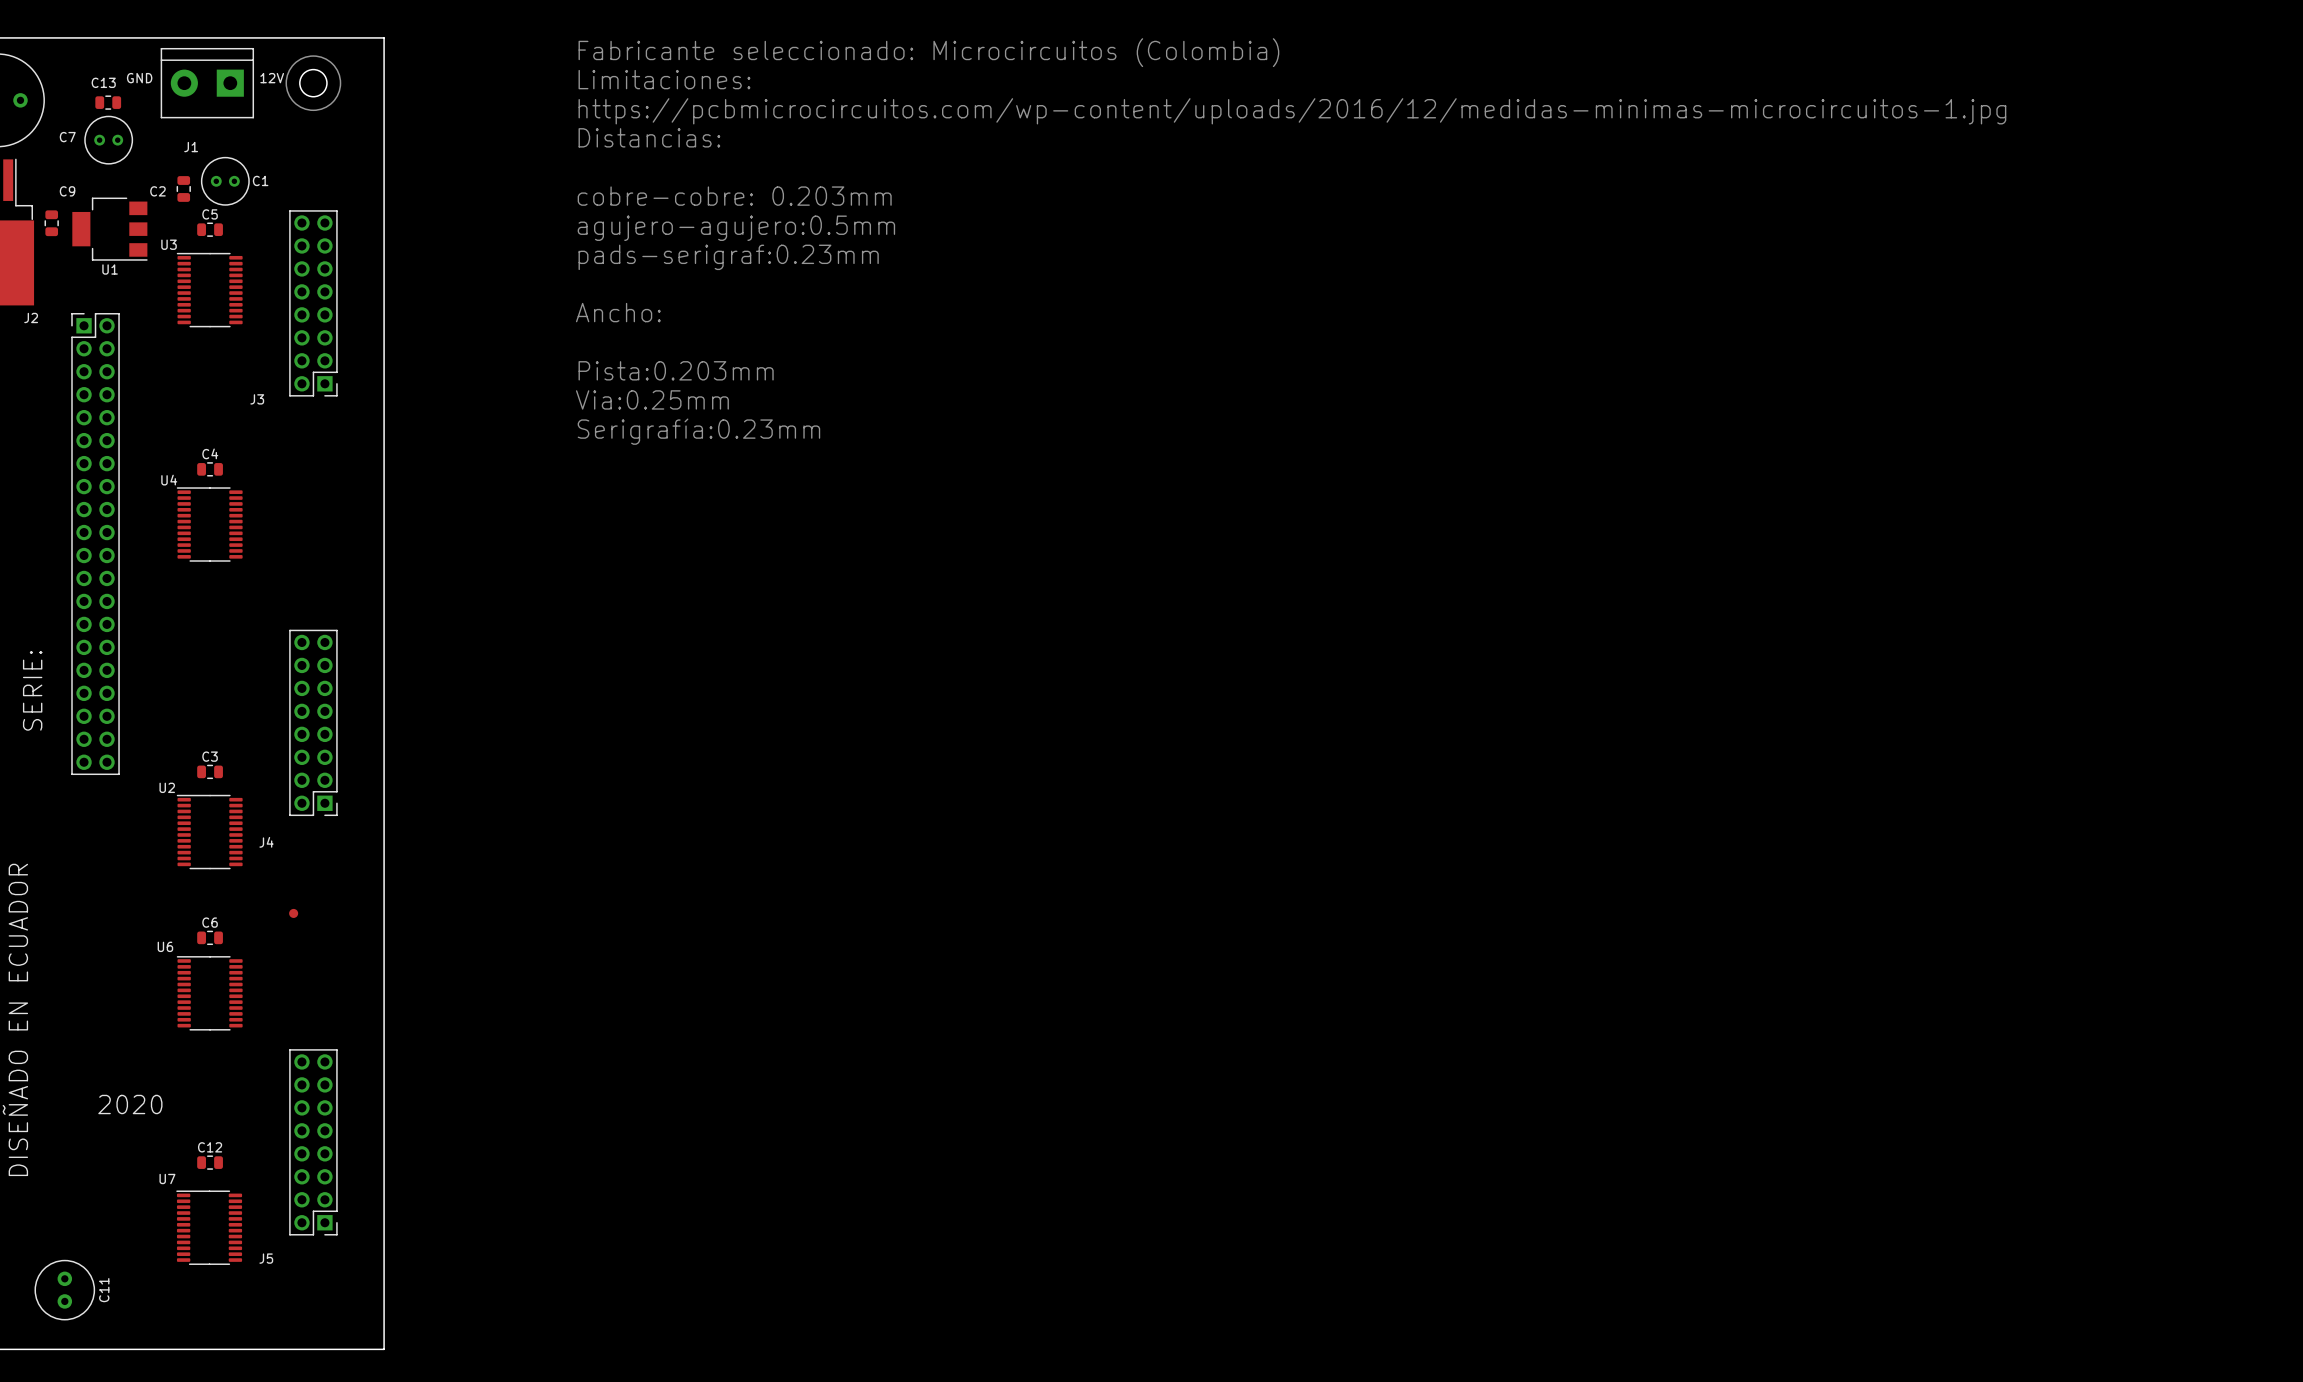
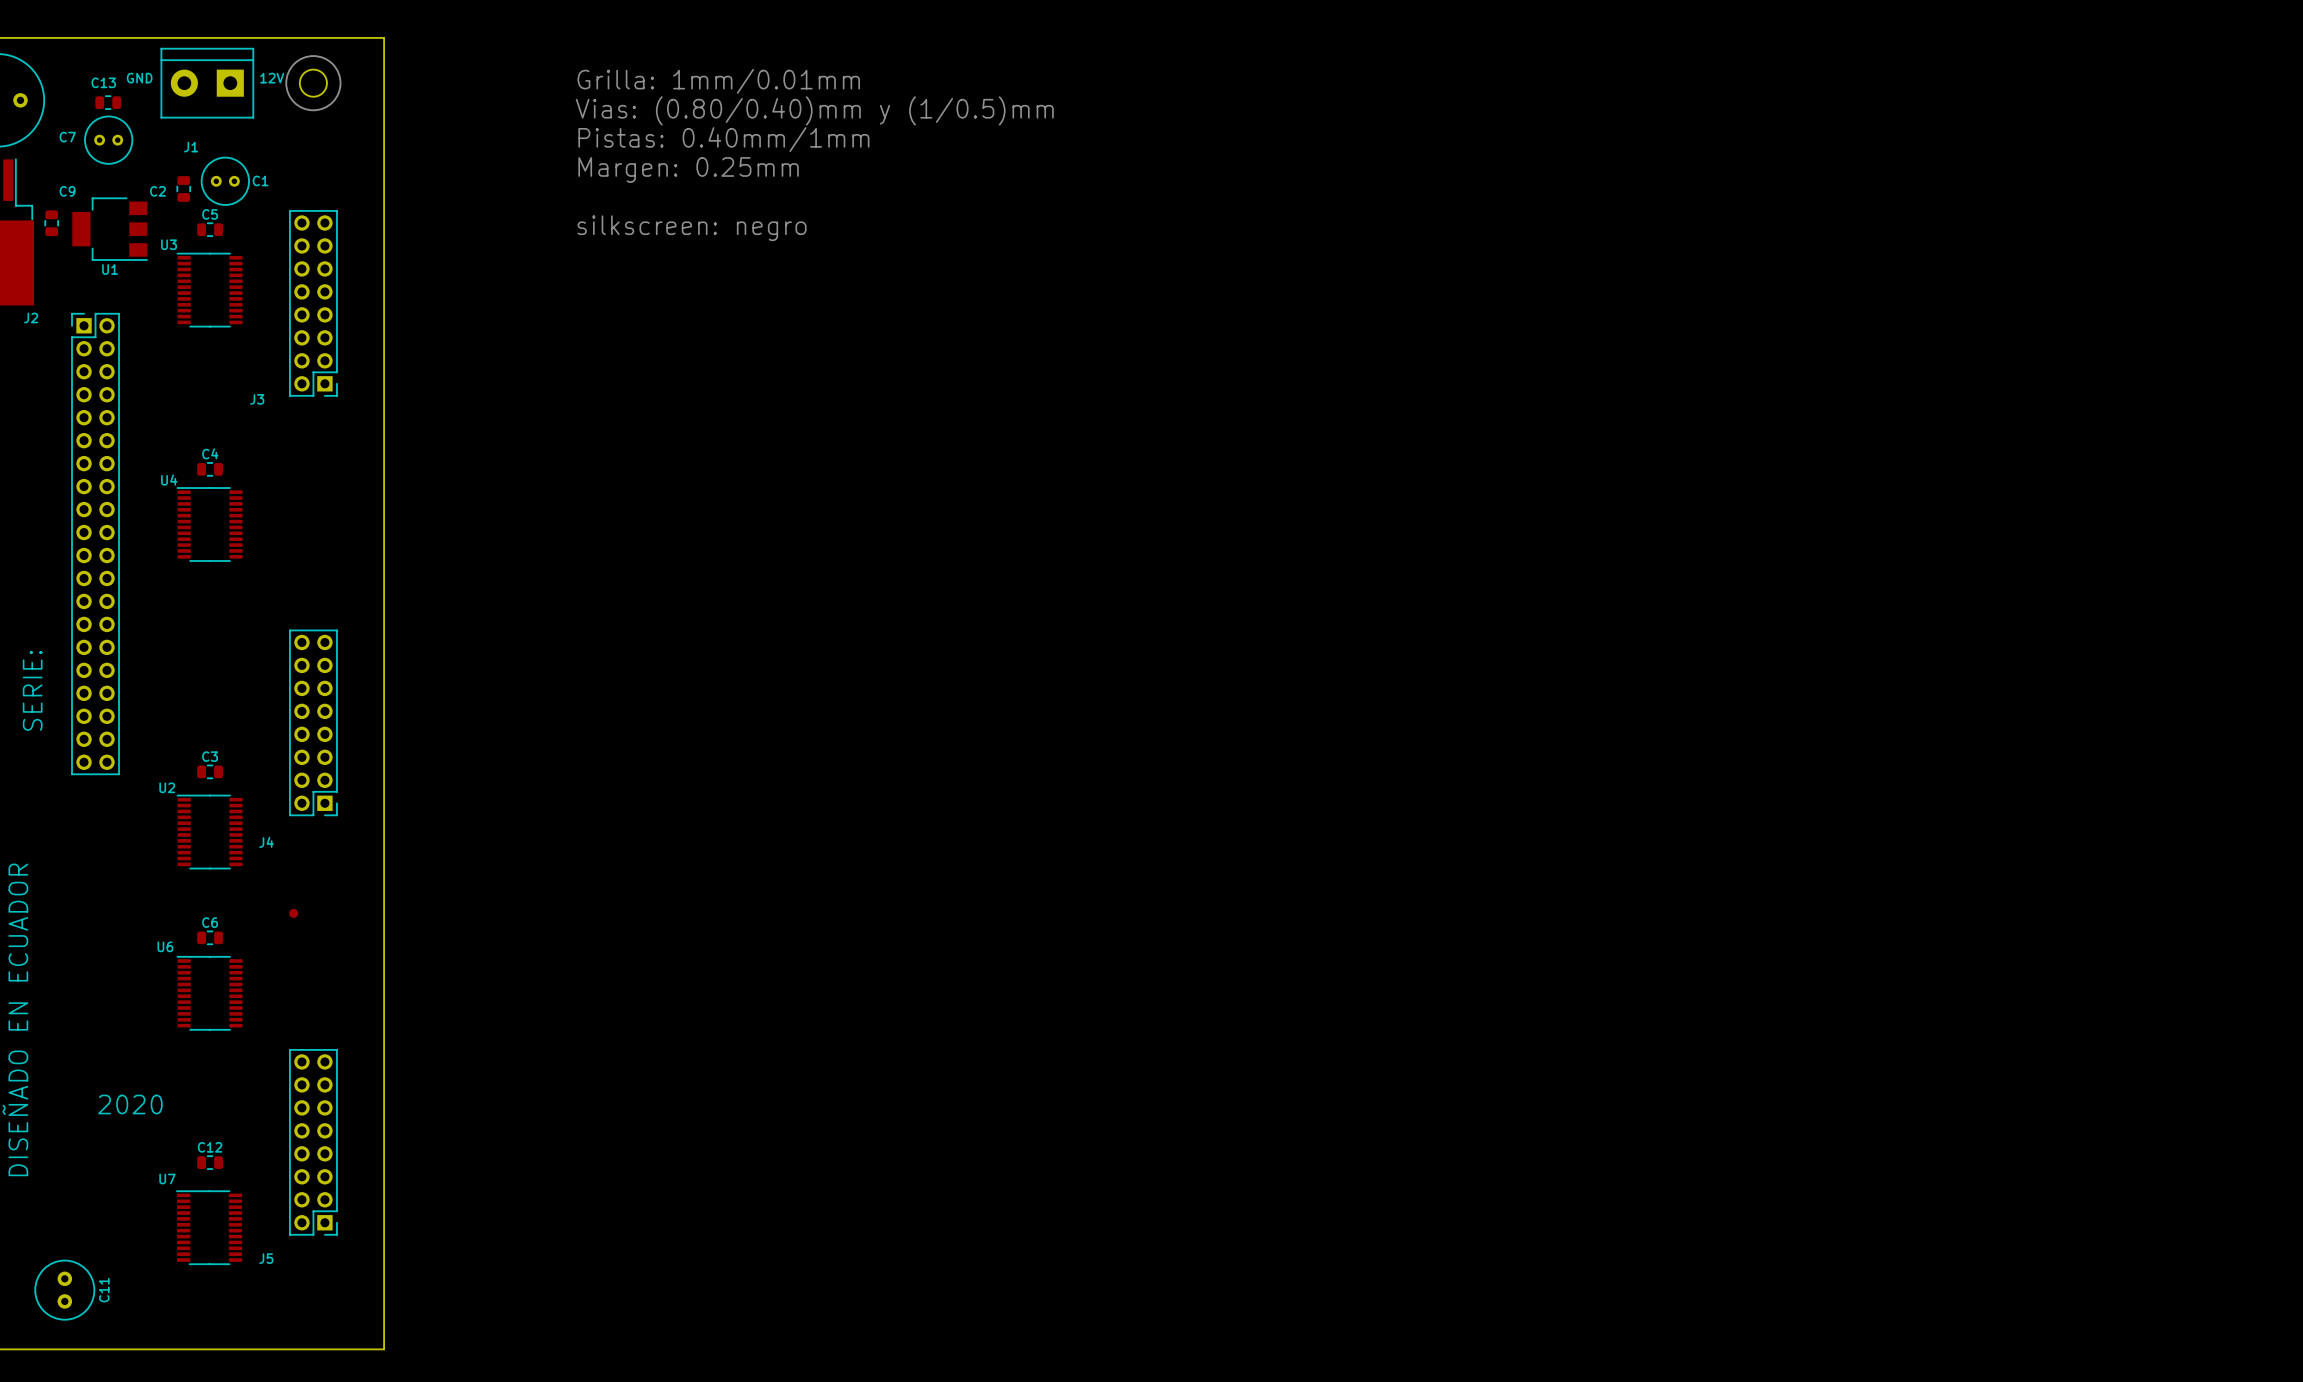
text: Fabricante seleccionado: Microcircuitos (Colombia) (928, 52) -> none
text: Limitaciones: (664, 79) -> Grilla: 1mm/0.01mm (718, 81)
text: https://pcbmicrocircuitos.com/wp-content/uploads/2016/12/medidas-minimas-microcircuitos-1.jpg (1292, 111) -> Vias: (0.80/0.40)mm y (1/0.5)mm (814, 110)
text: Distancias: (649, 137) -> Pistas: 0.40mm/1mm (723, 139)
text: none -> Margen: 0.25mm (688, 169)
text: cobre-cobre: 0.203mm (734, 196) -> none
text: agujero-agujero:0.5mm (736, 228) -> silkscreen: negro (692, 228)
text: pads-serigraf:0.23mm (728, 257) -> none
text: Ancho: (618, 312) -> none
text: Pista:0.203mm (676, 370) -> none
text: Via:0.25mm (652, 399) -> none
text: Serigrafía:0.23mm (698, 431) -> none

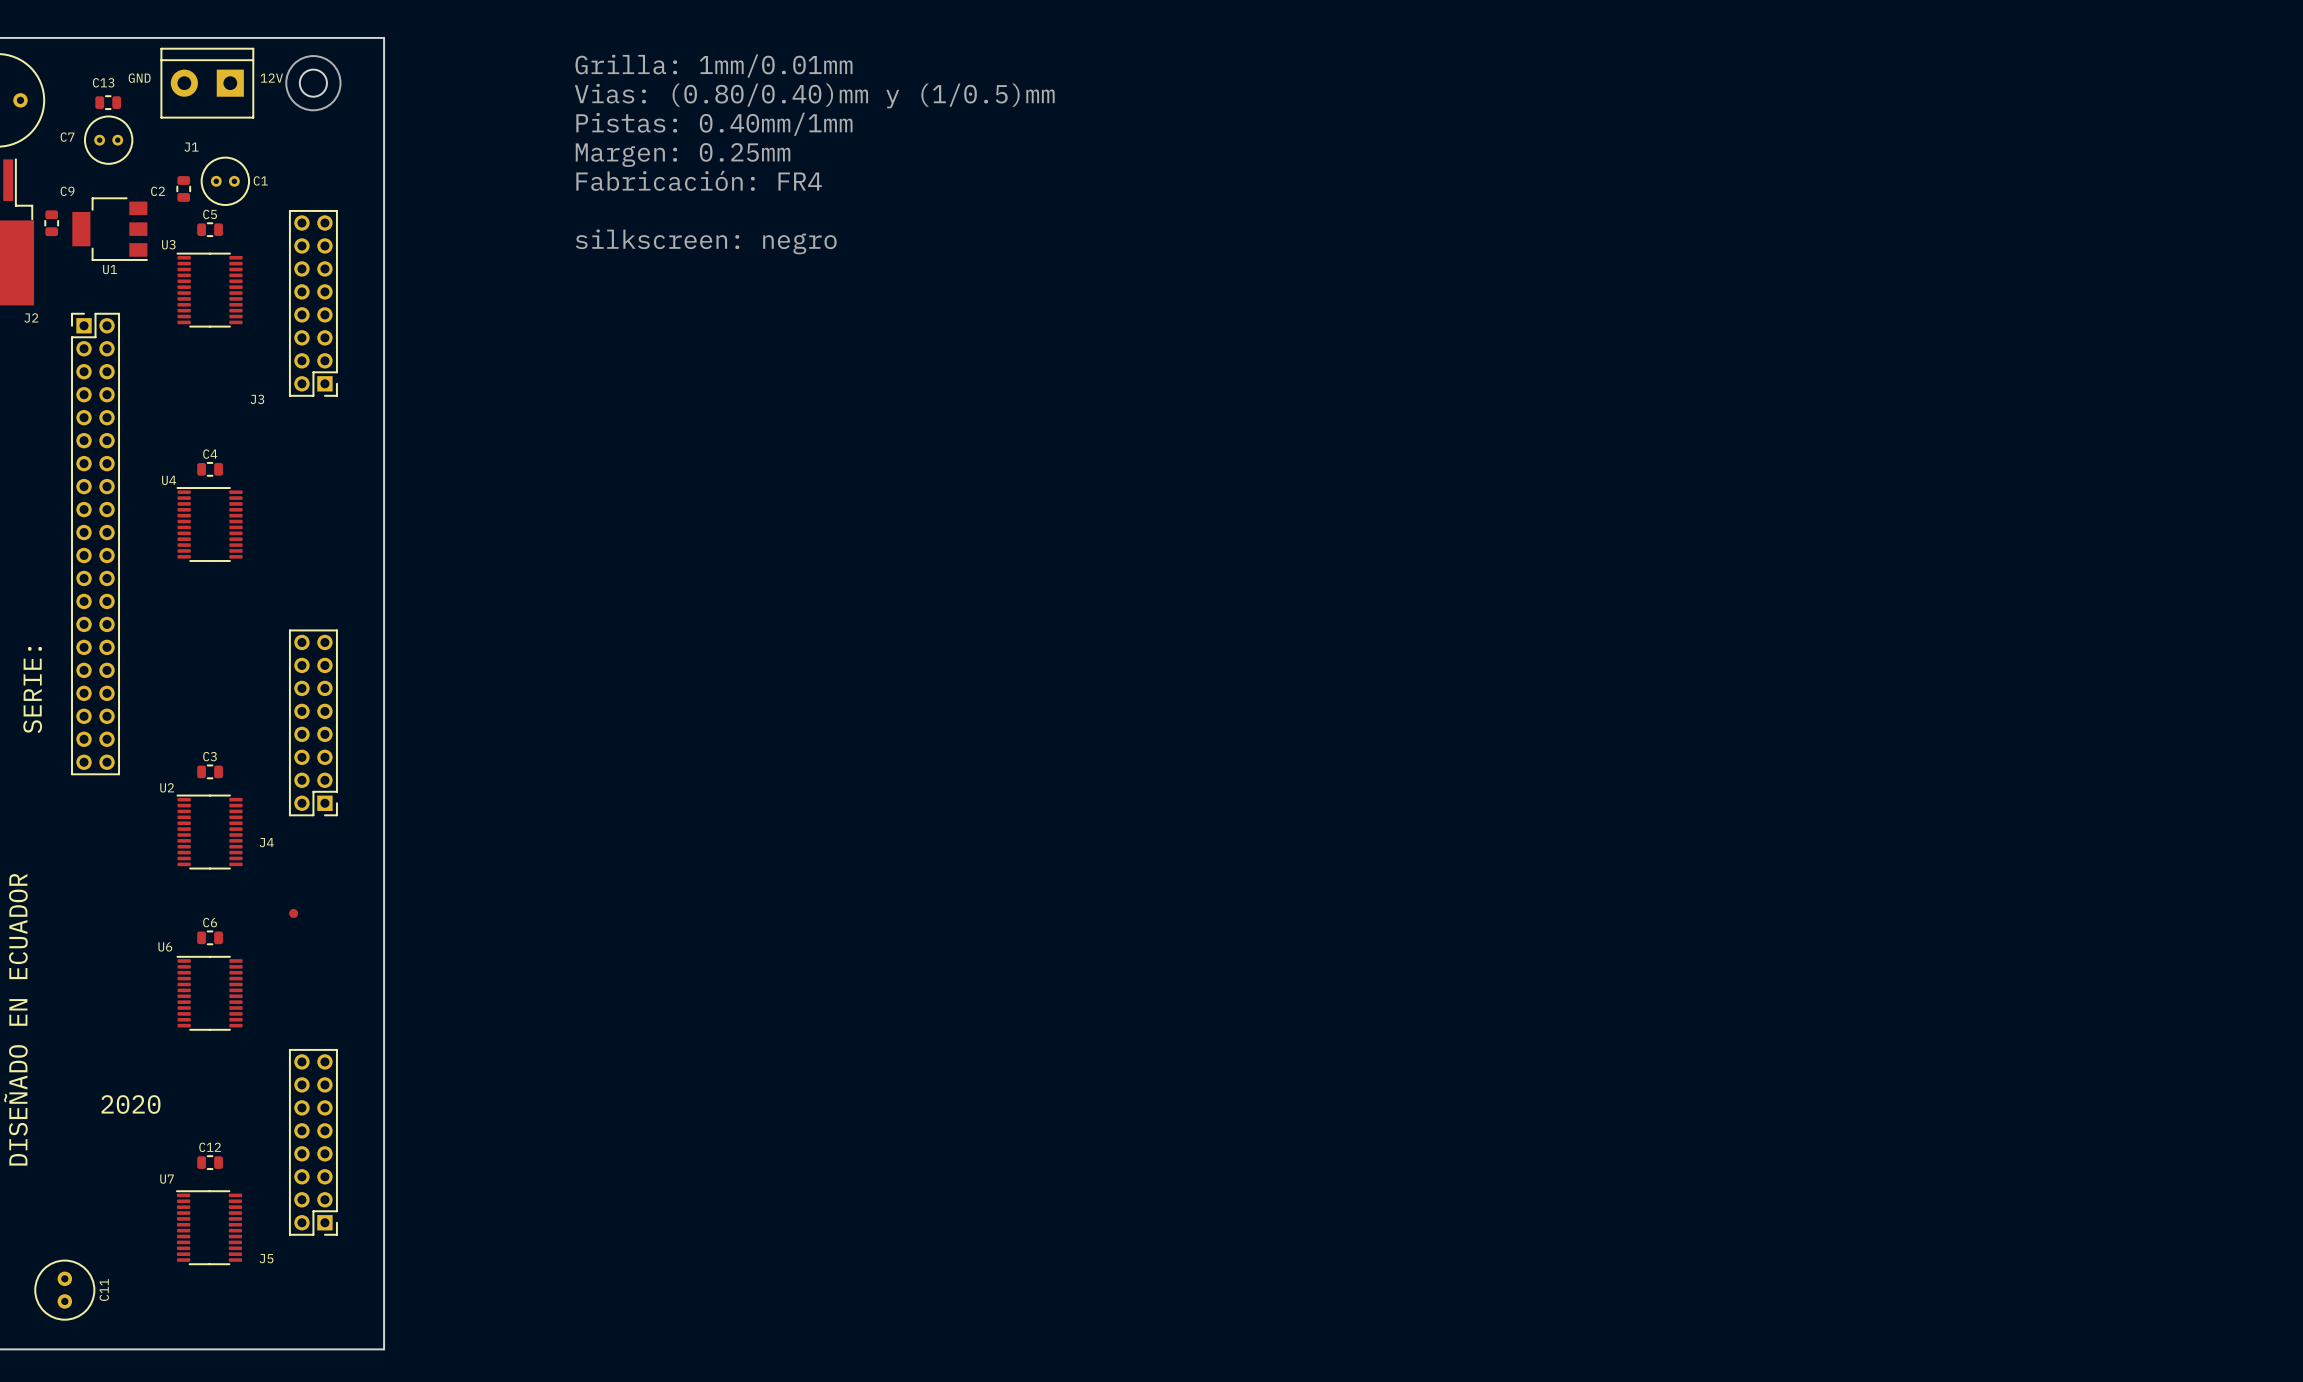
text position: Grilla: 1mm/0.01mm (718, 81) -> Grilla: 1mm/0.01mm (713, 66)
text position: Vias: (0.80/0.40)mm y (1/0.5)mm (814, 110) -> Vias: (0.80/0.40)mm y (1/0.5)mm (814, 95)
text position: Pistas: 0.40mm/1mm (723, 139) -> Pistas: 0.40mm/1mm (714, 124)
text position: Margen: 0.25mm (688, 169) -> Margen: 0.25mm (683, 154)
text: none -> Fabricación: FR4 (699, 180)
text position: silkscreen: negro (692, 228) -> silkscreen: negro (706, 241)

